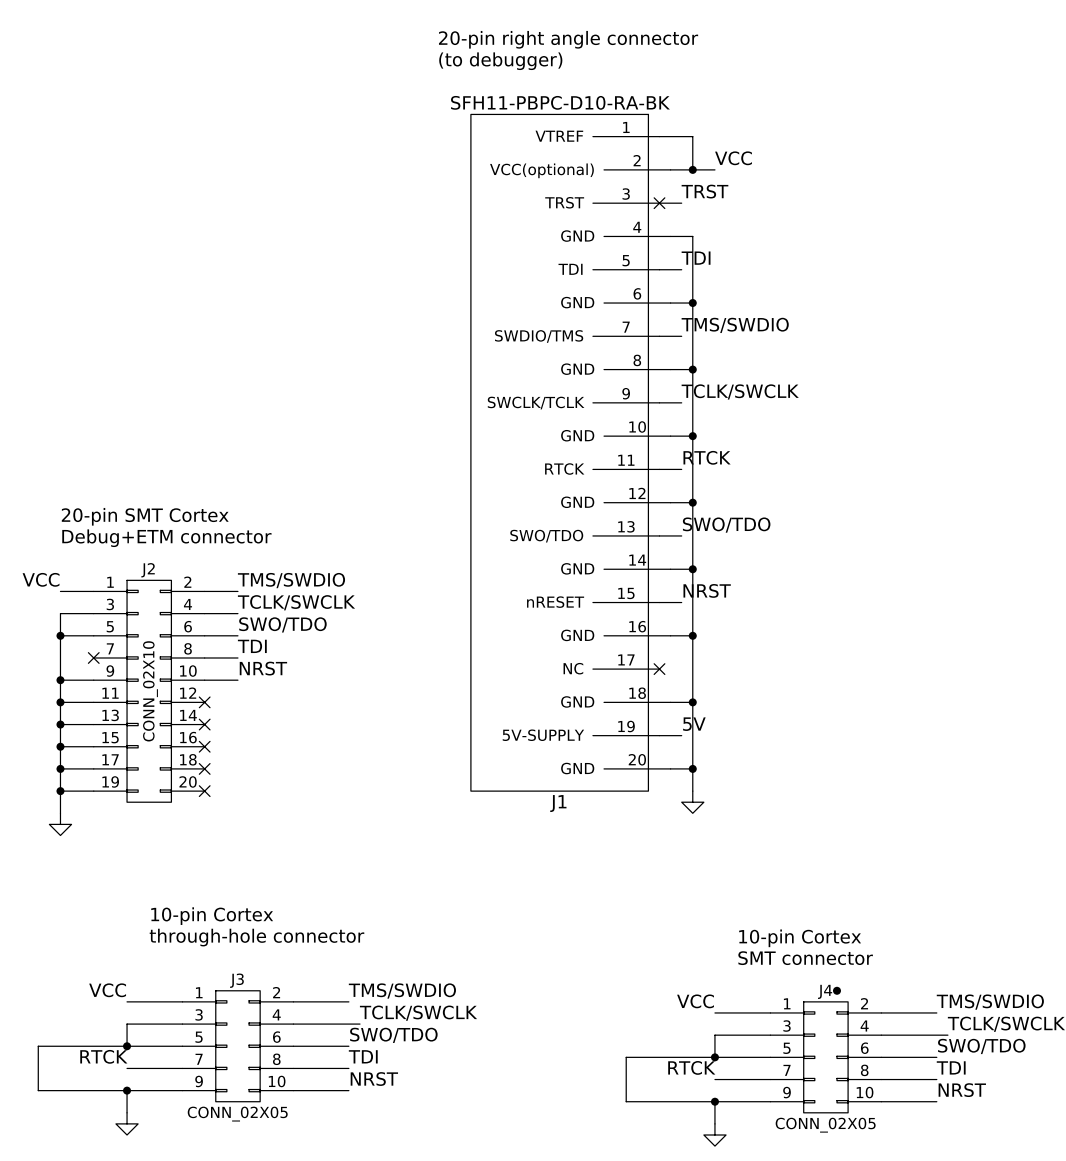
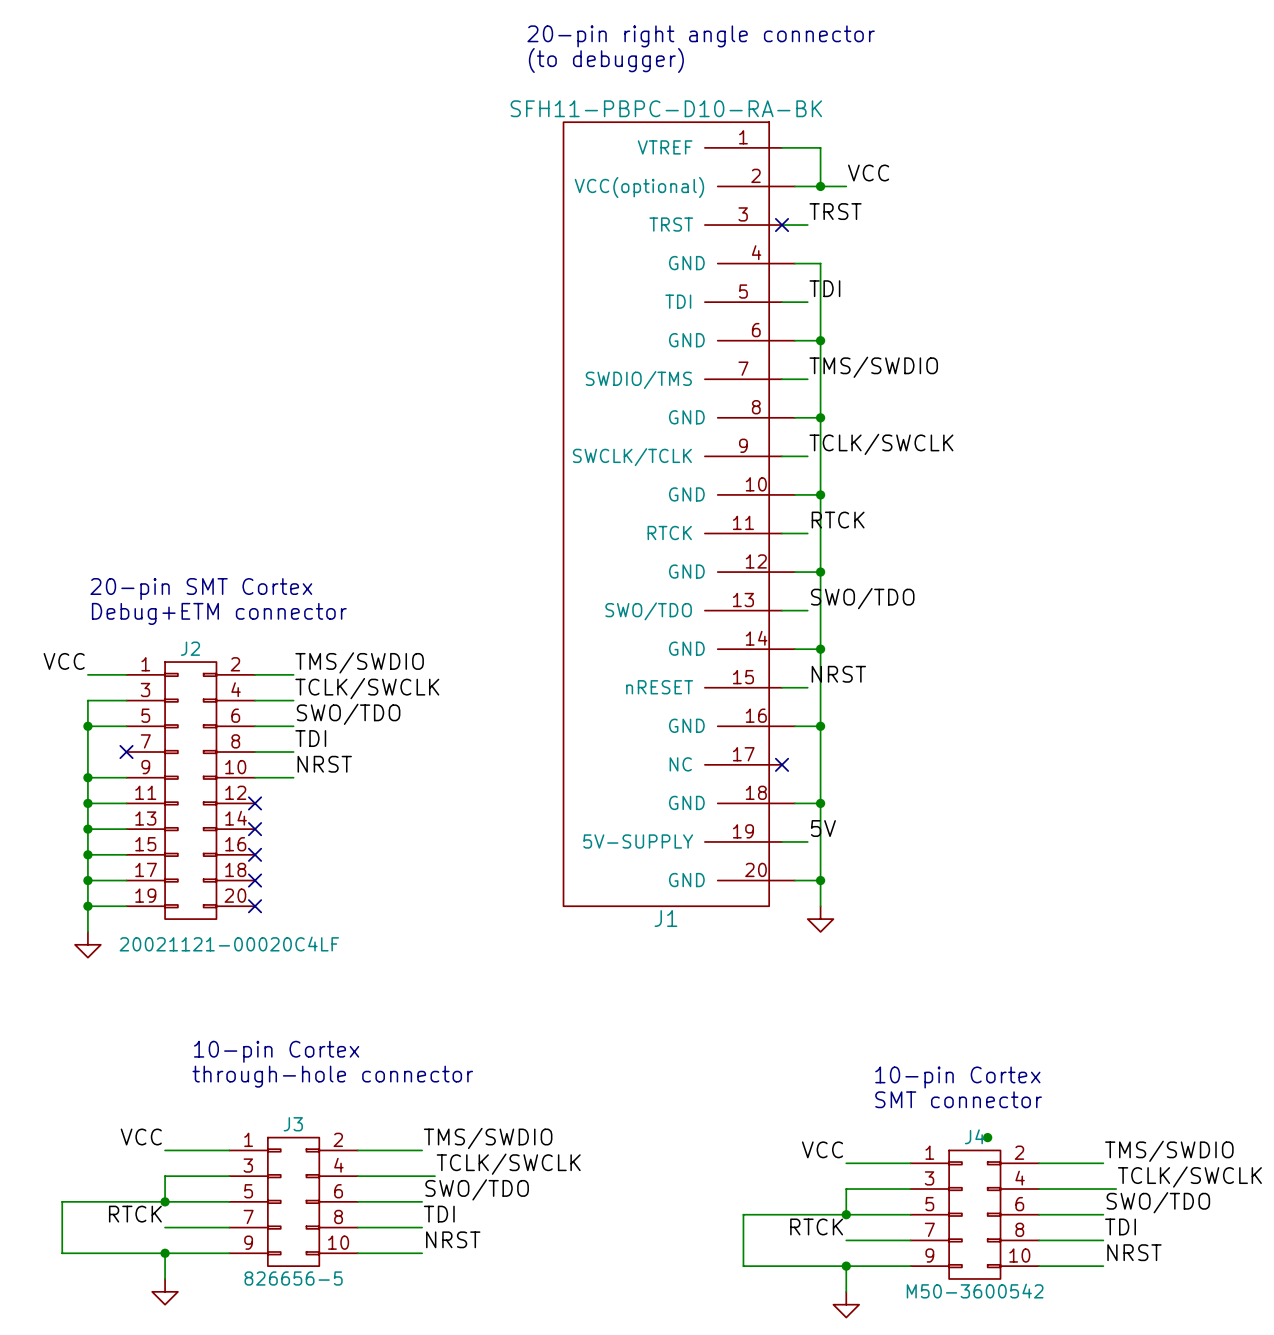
J2 value: CONN_02X10 (150, 691) -> 20021121-00020C4LF (229, 944)
J3 value: CONN_02X05 (237, 1114) -> 826656-5 (293, 1278)
J4 value: CONN_02X05 (825, 1125) -> M50-3600542 (975, 1291)

